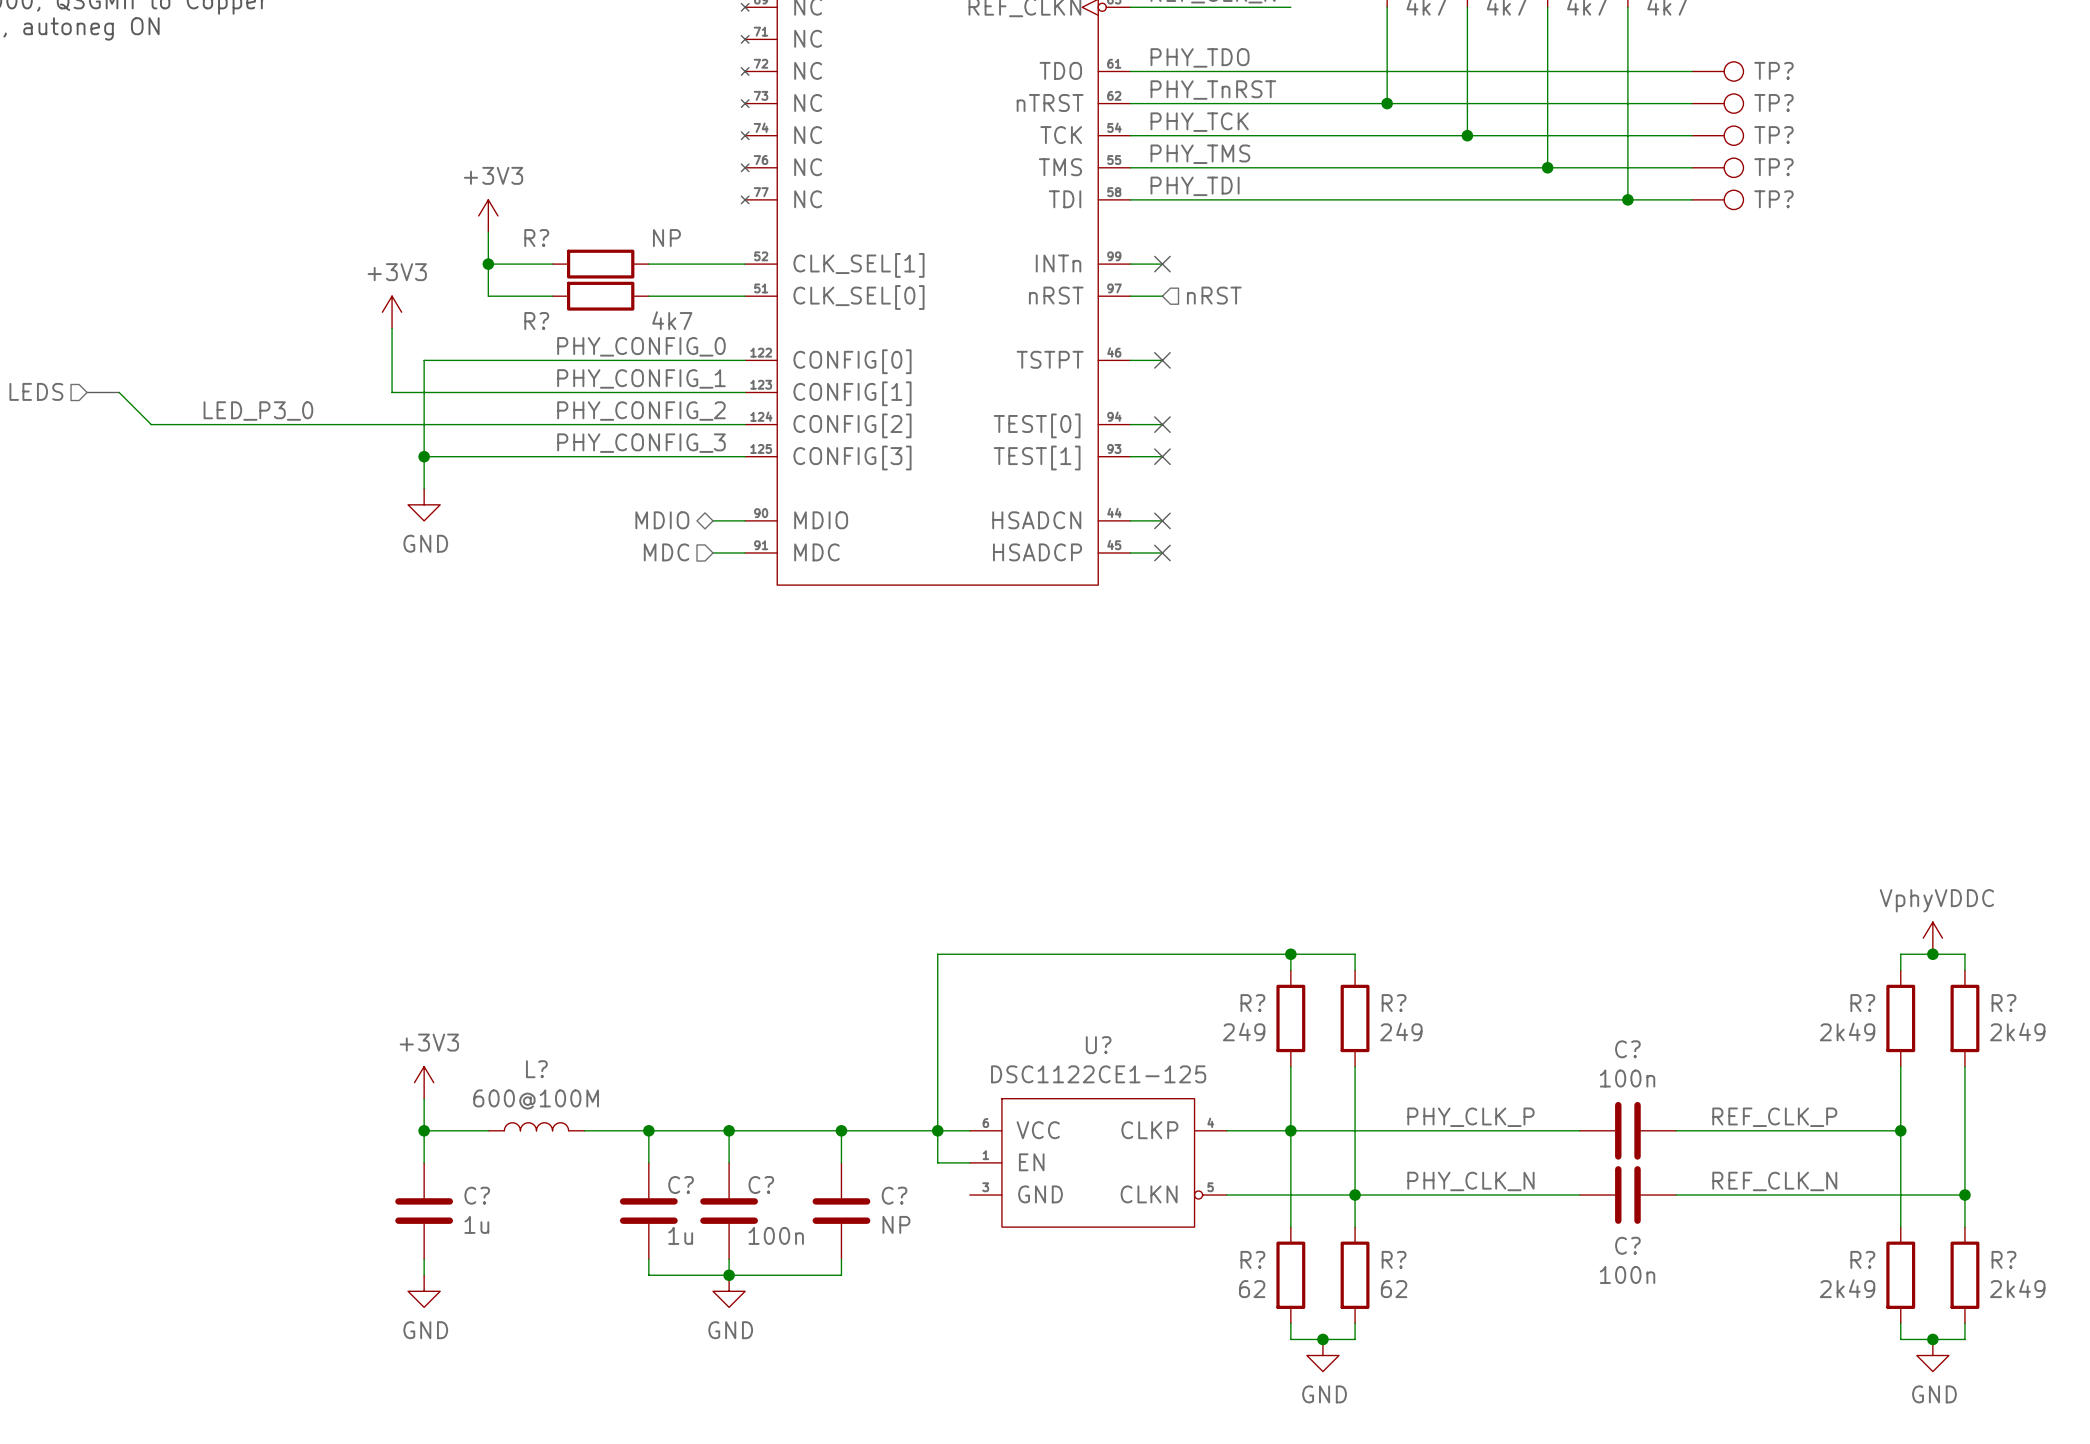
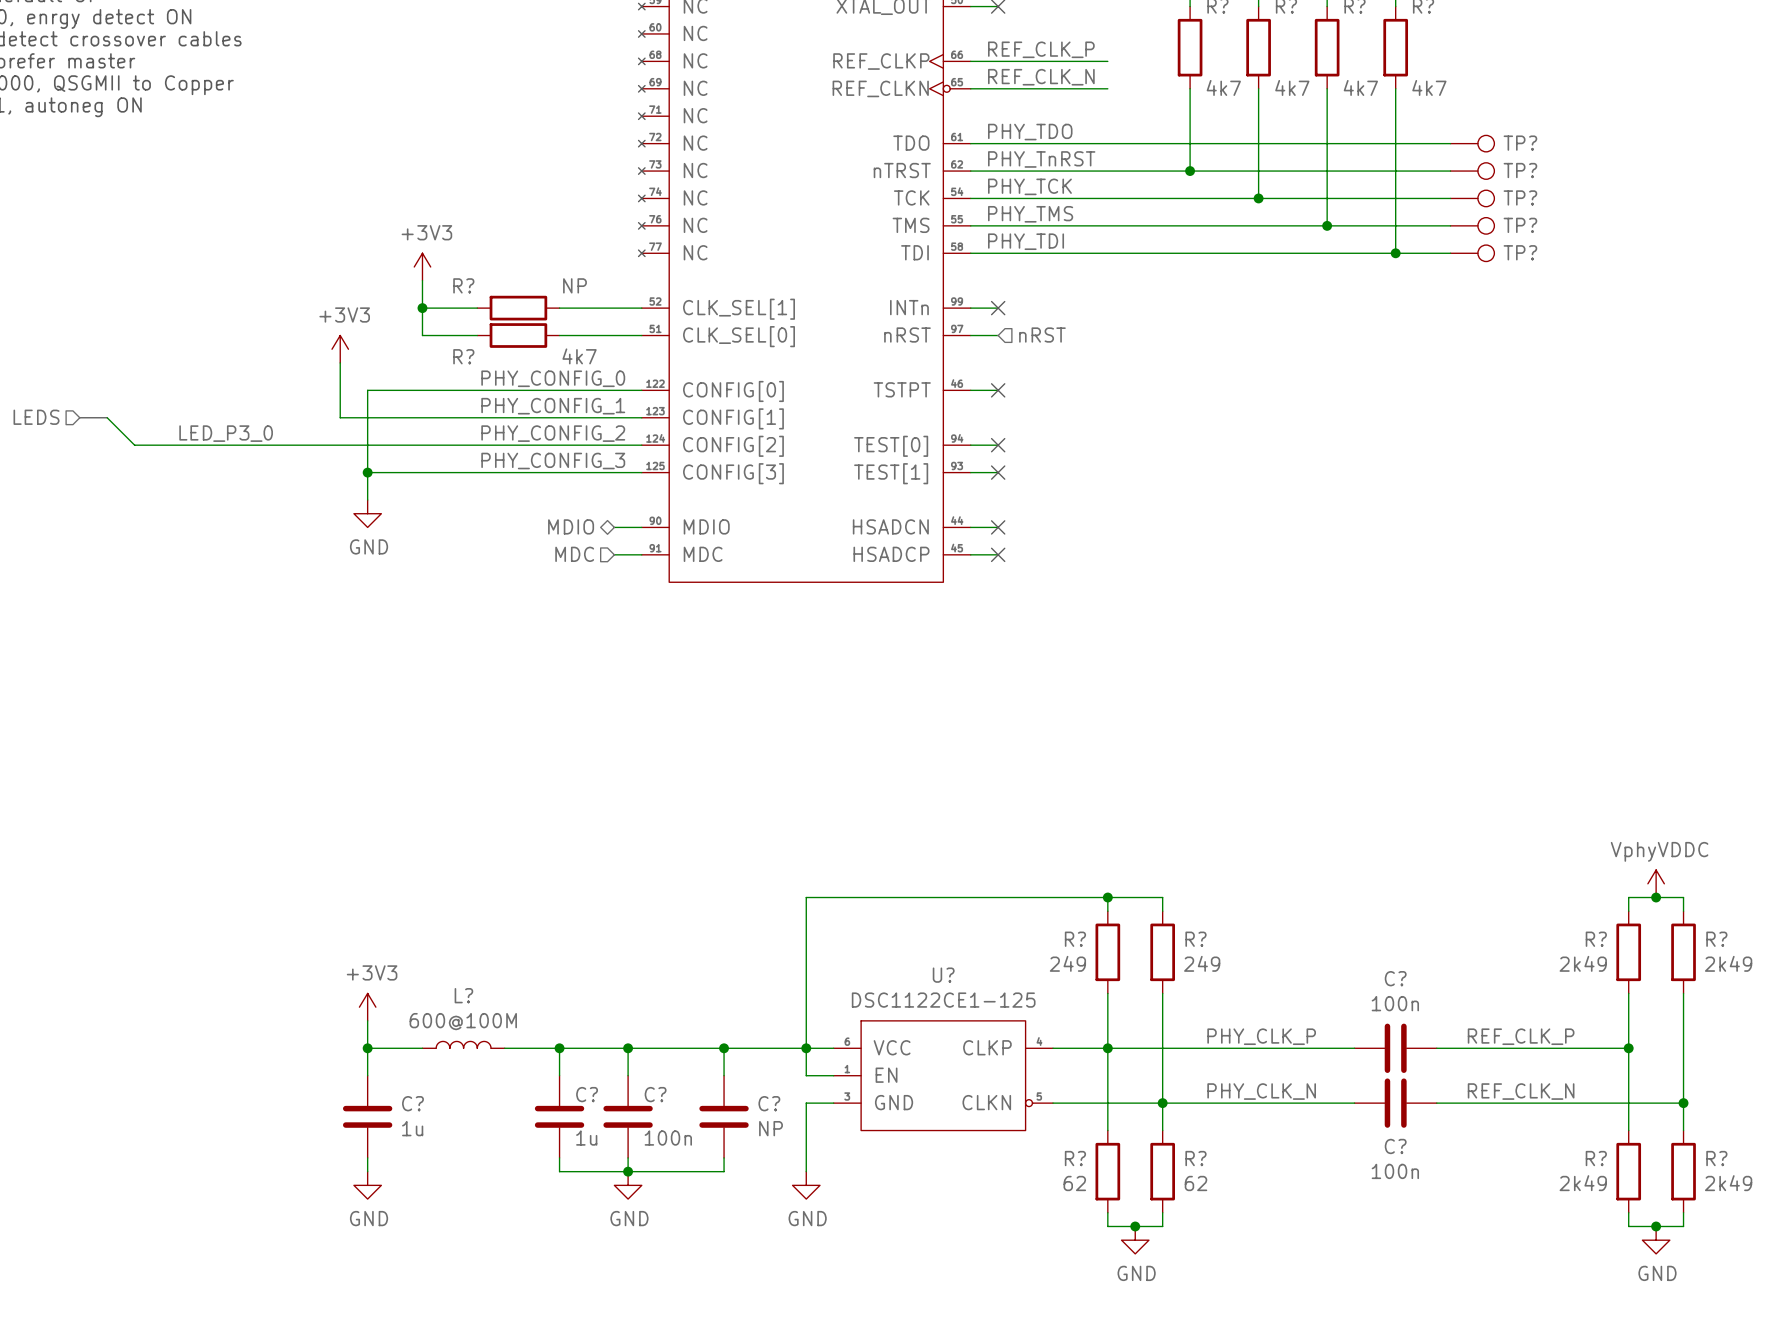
wire: none -> (833, 1103) (806, 1103) (806, 1171)
power symbol: none -> GND (806, 1185)

